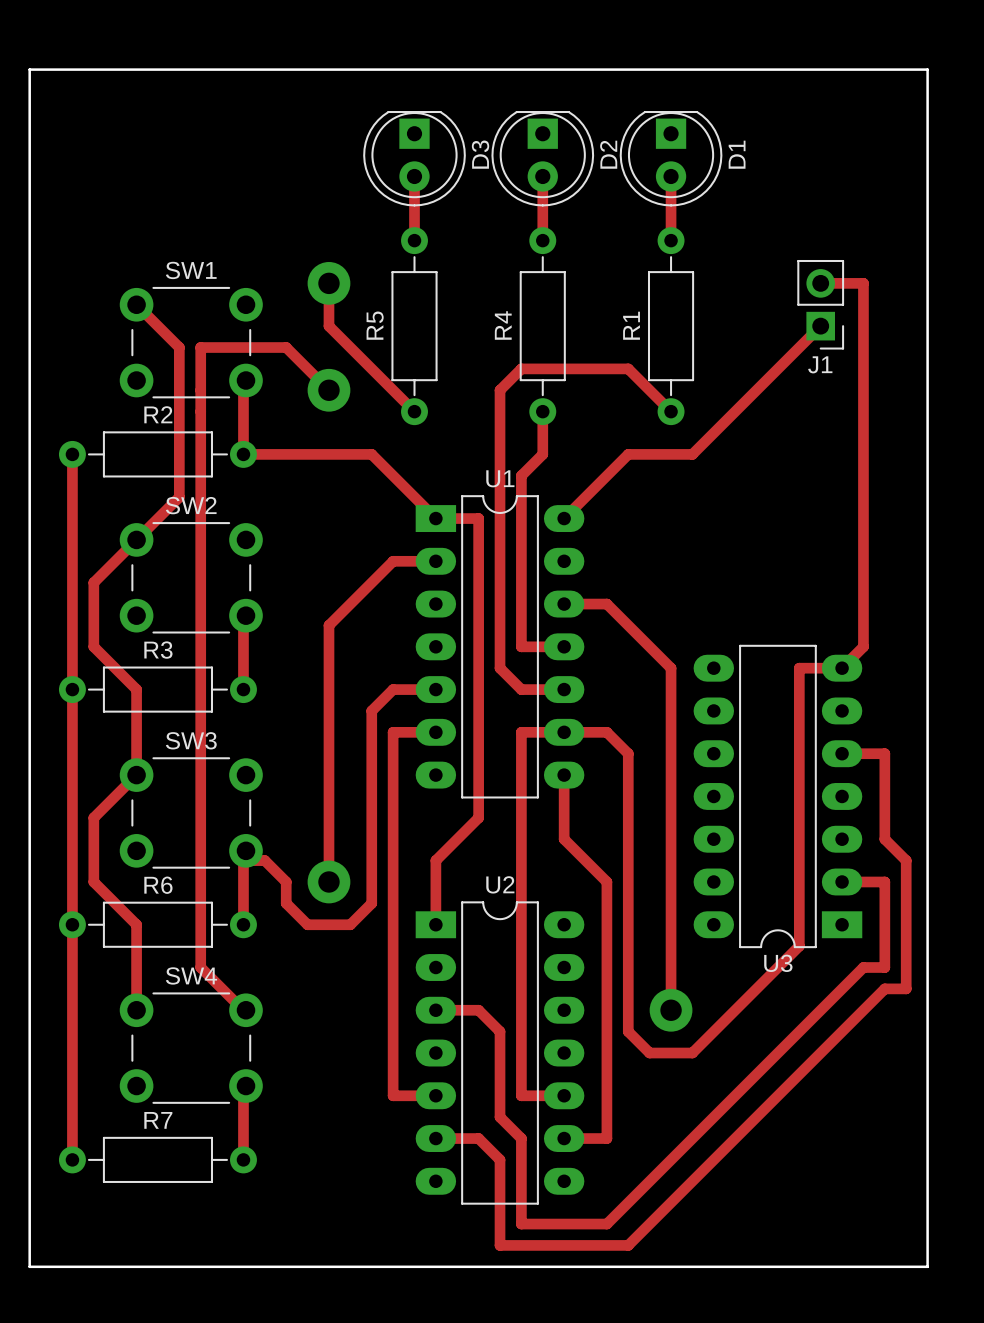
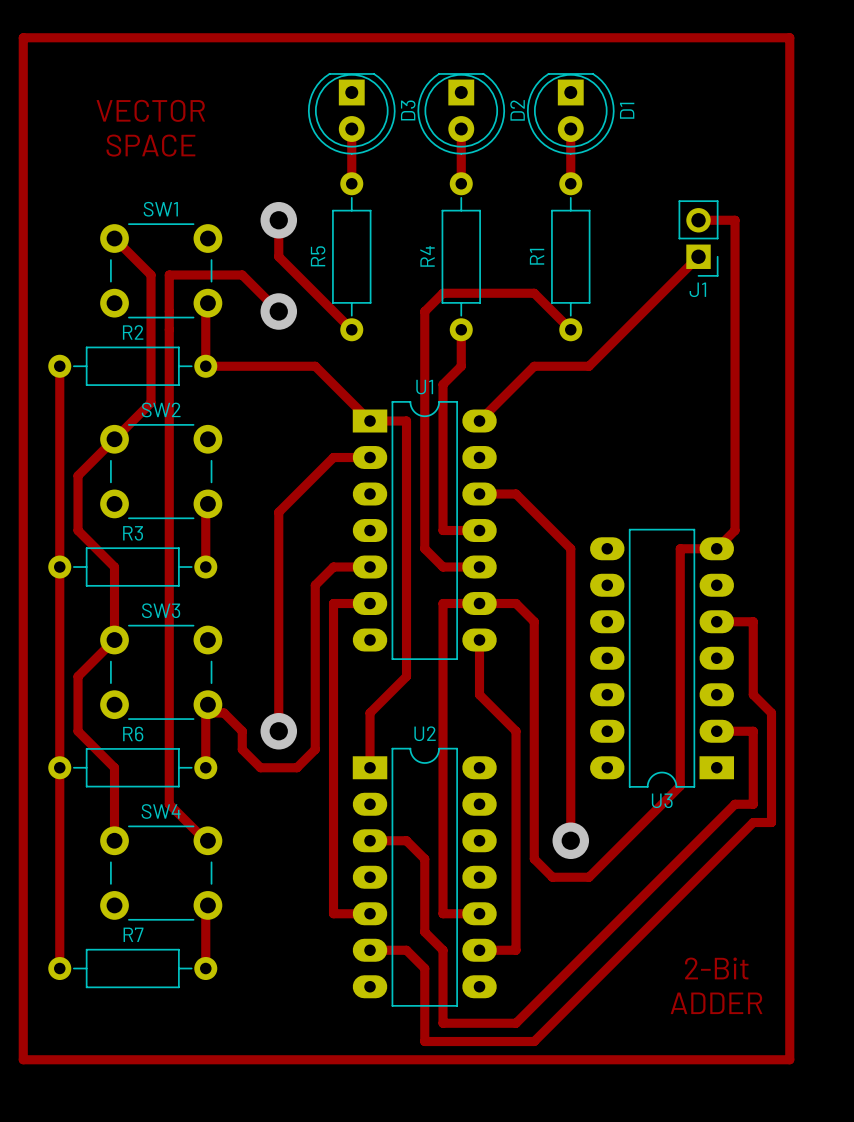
board edge: (29, 69) (29, 1266) (927, 1266) (927, 69) (29, 69) -> none
track: none -> (23, 37) (789, 37) (789, 1059) (23, 1059) (23, 37)
text: none -> VECTOR (150, 110)
text: none -> SPACE (150, 145)
text: none -> 2-Bit (716, 968)
text: none -> ADDER (716, 1003)

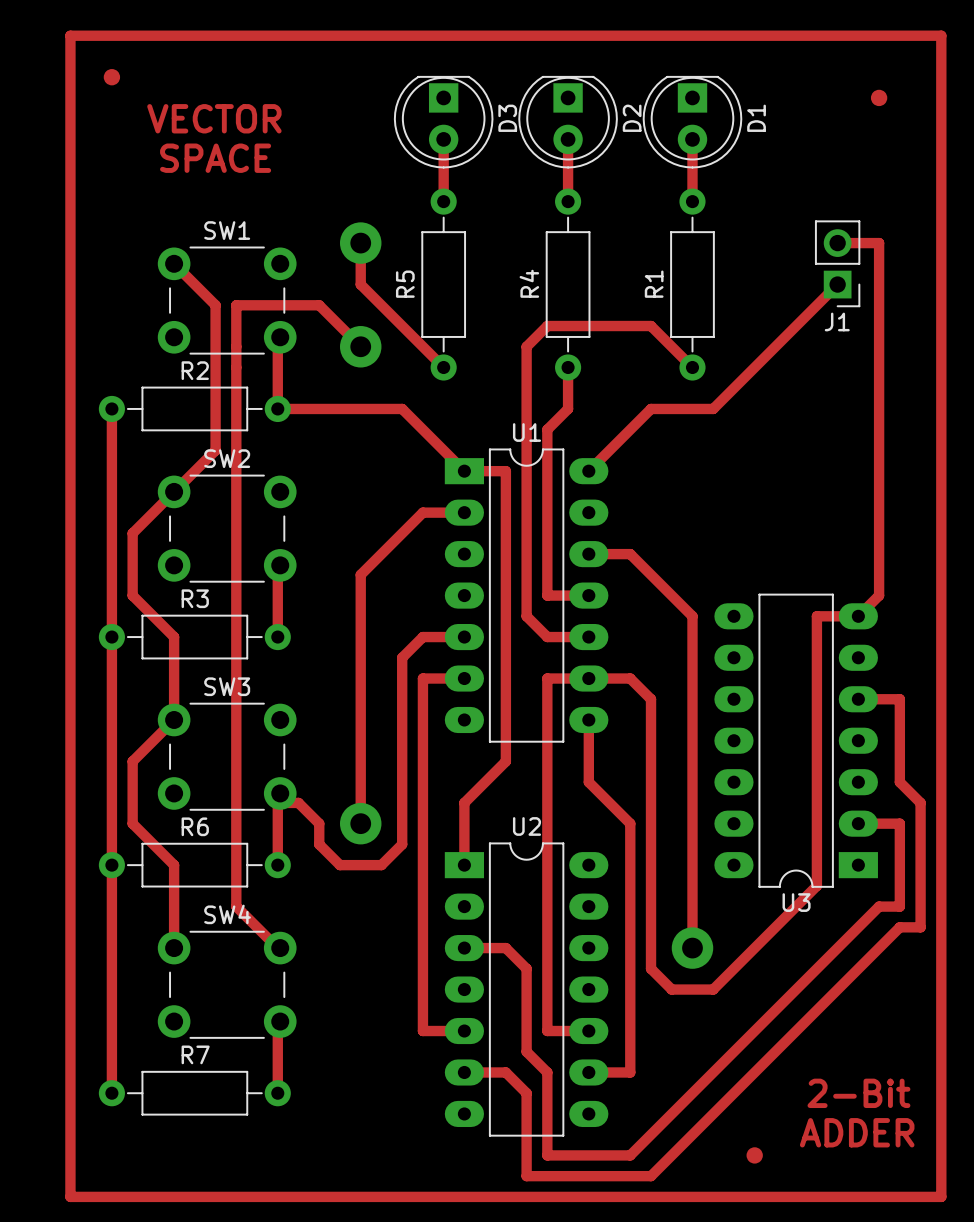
part: none -> (111, 77)
part: none -> (879, 97)
part: none -> (754, 1155)

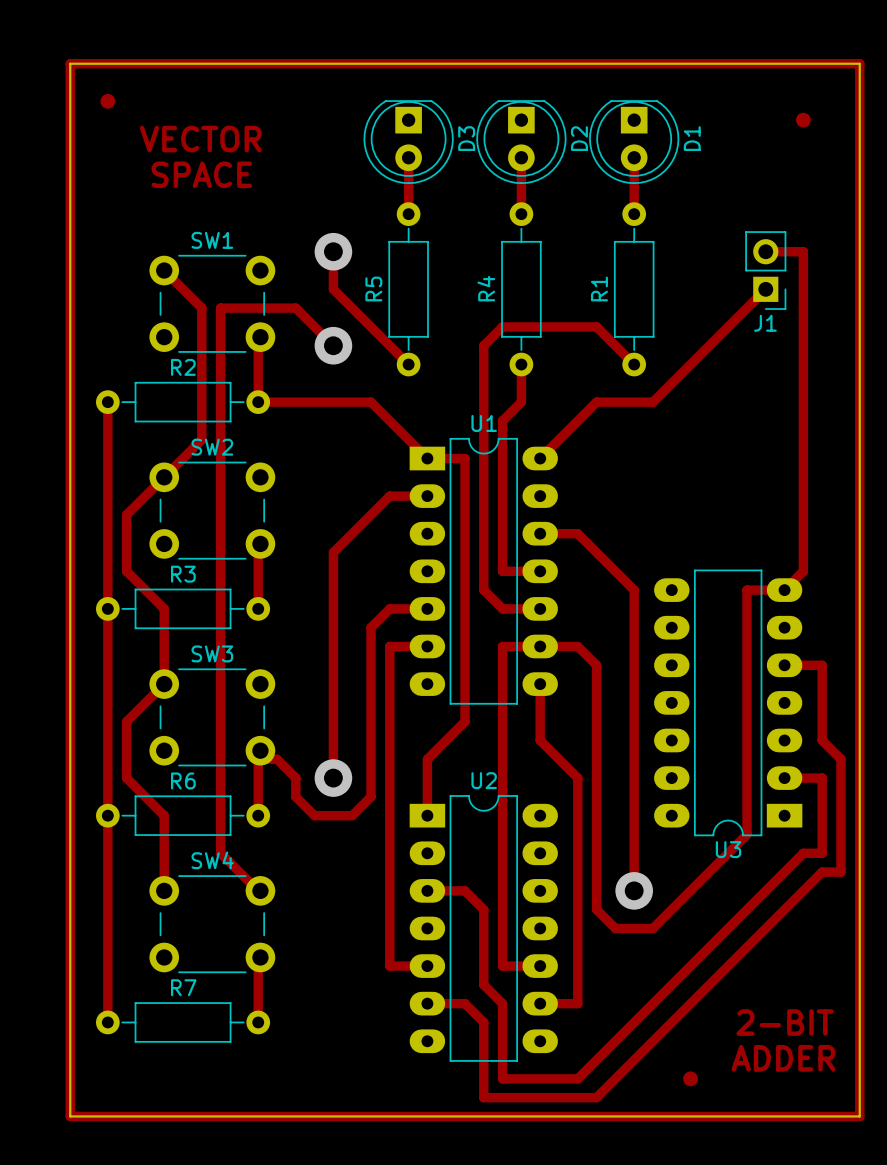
board edge: none -> (70, 63) (70, 1116) (859, 1116) (859, 63) (70, 63)
text: 2-Bit (858, 1093) -> 2-BIT (785, 1022)

